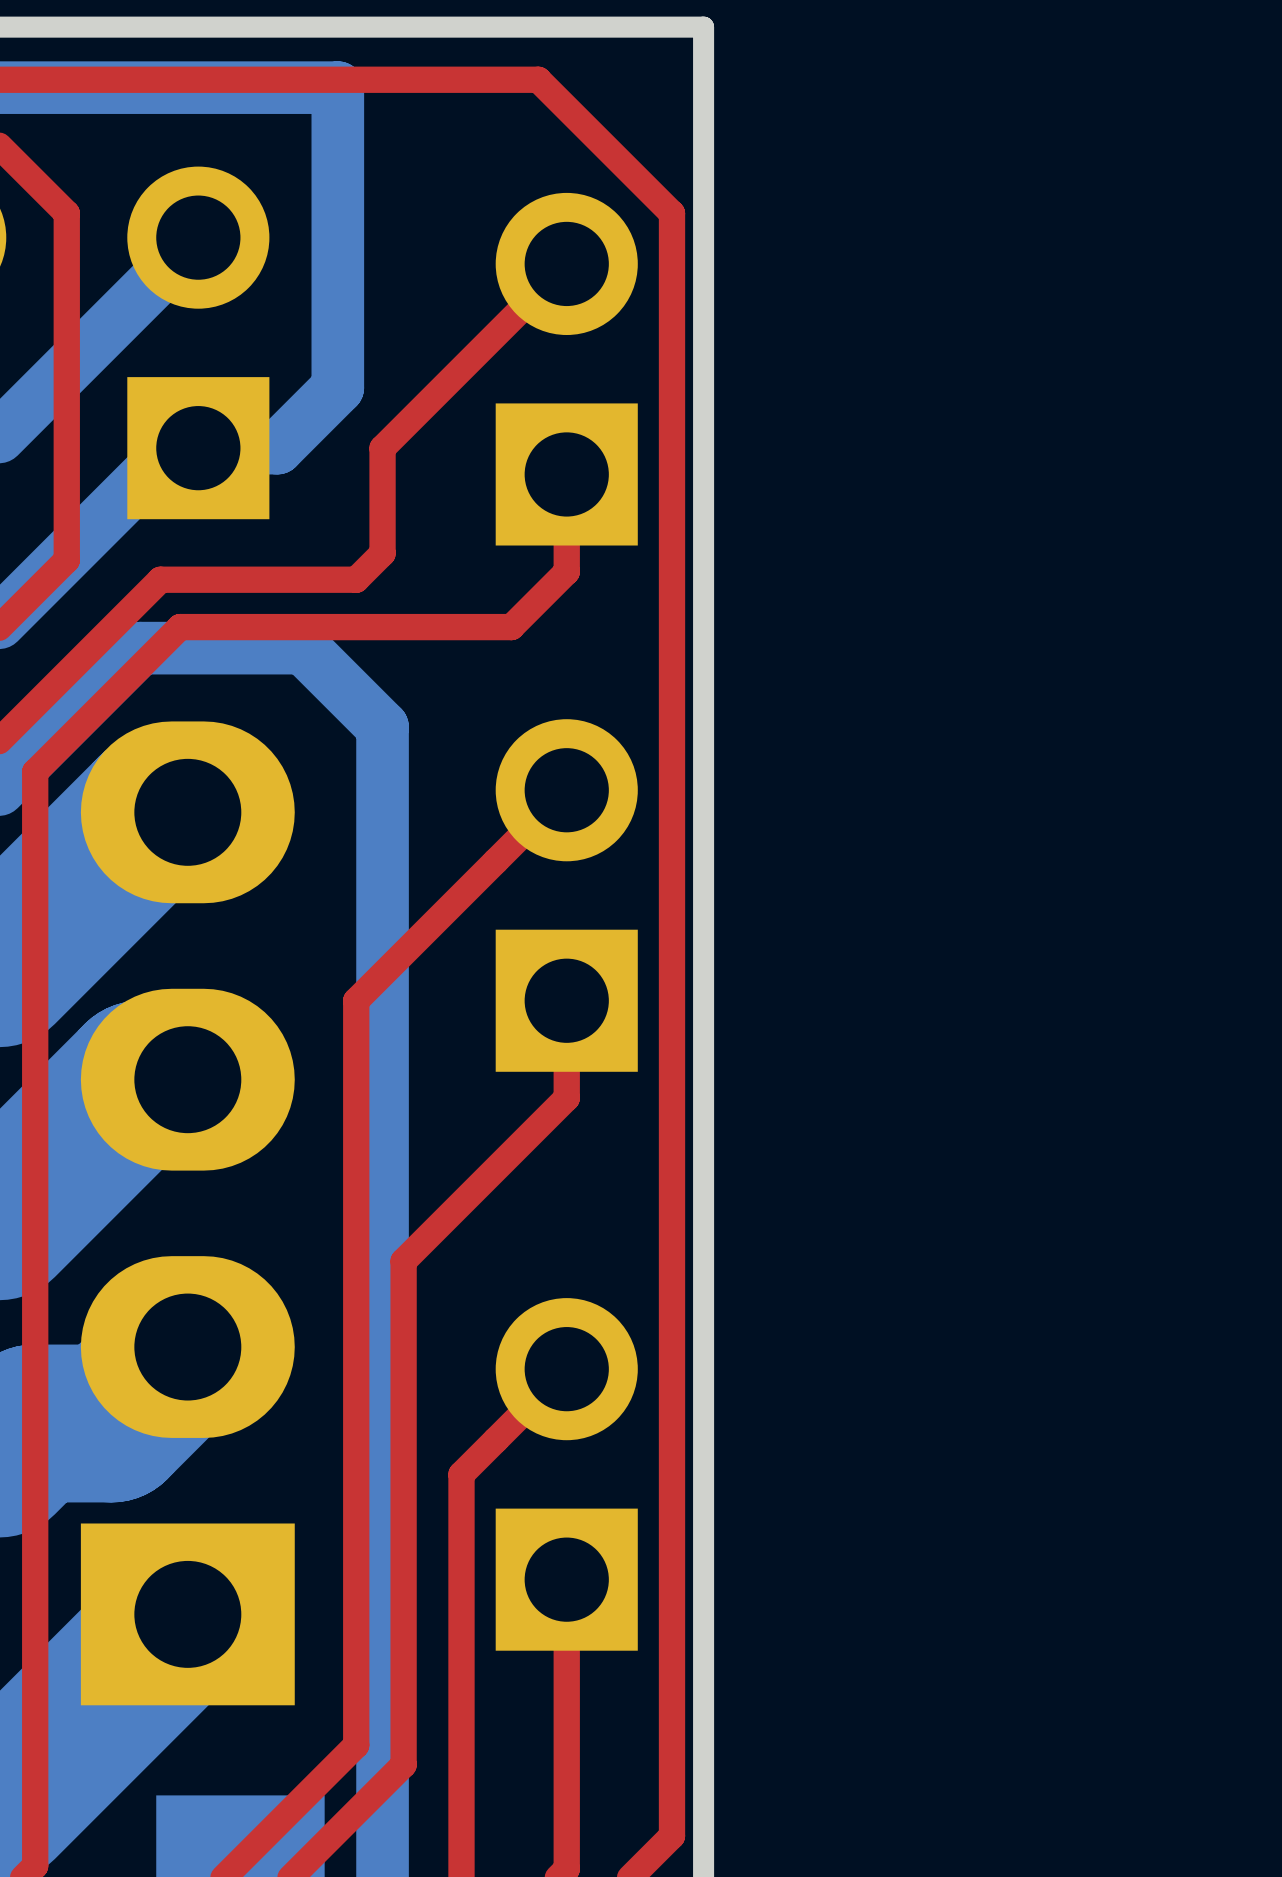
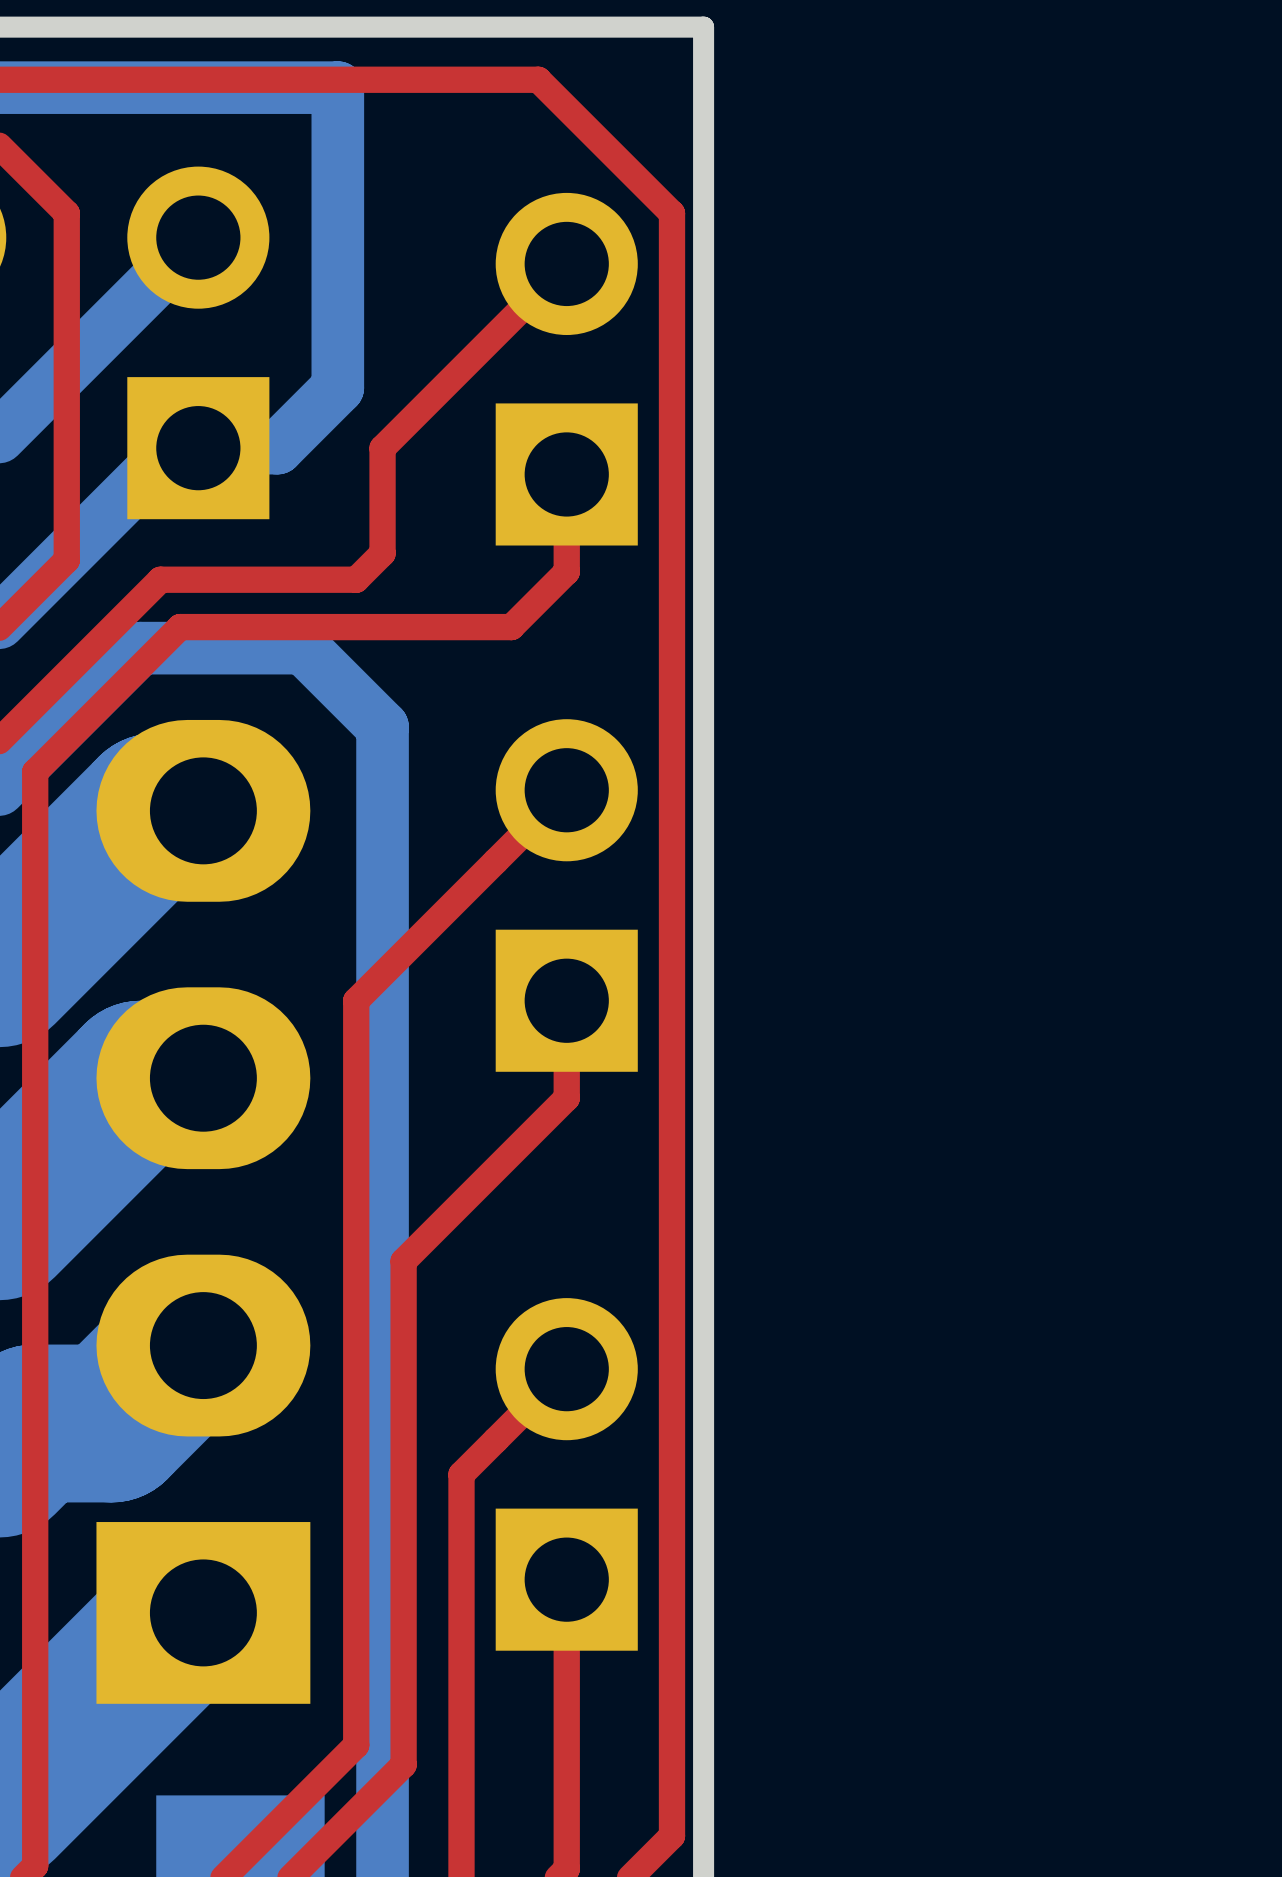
part position: (187, 1213) -> (203, 1211)

